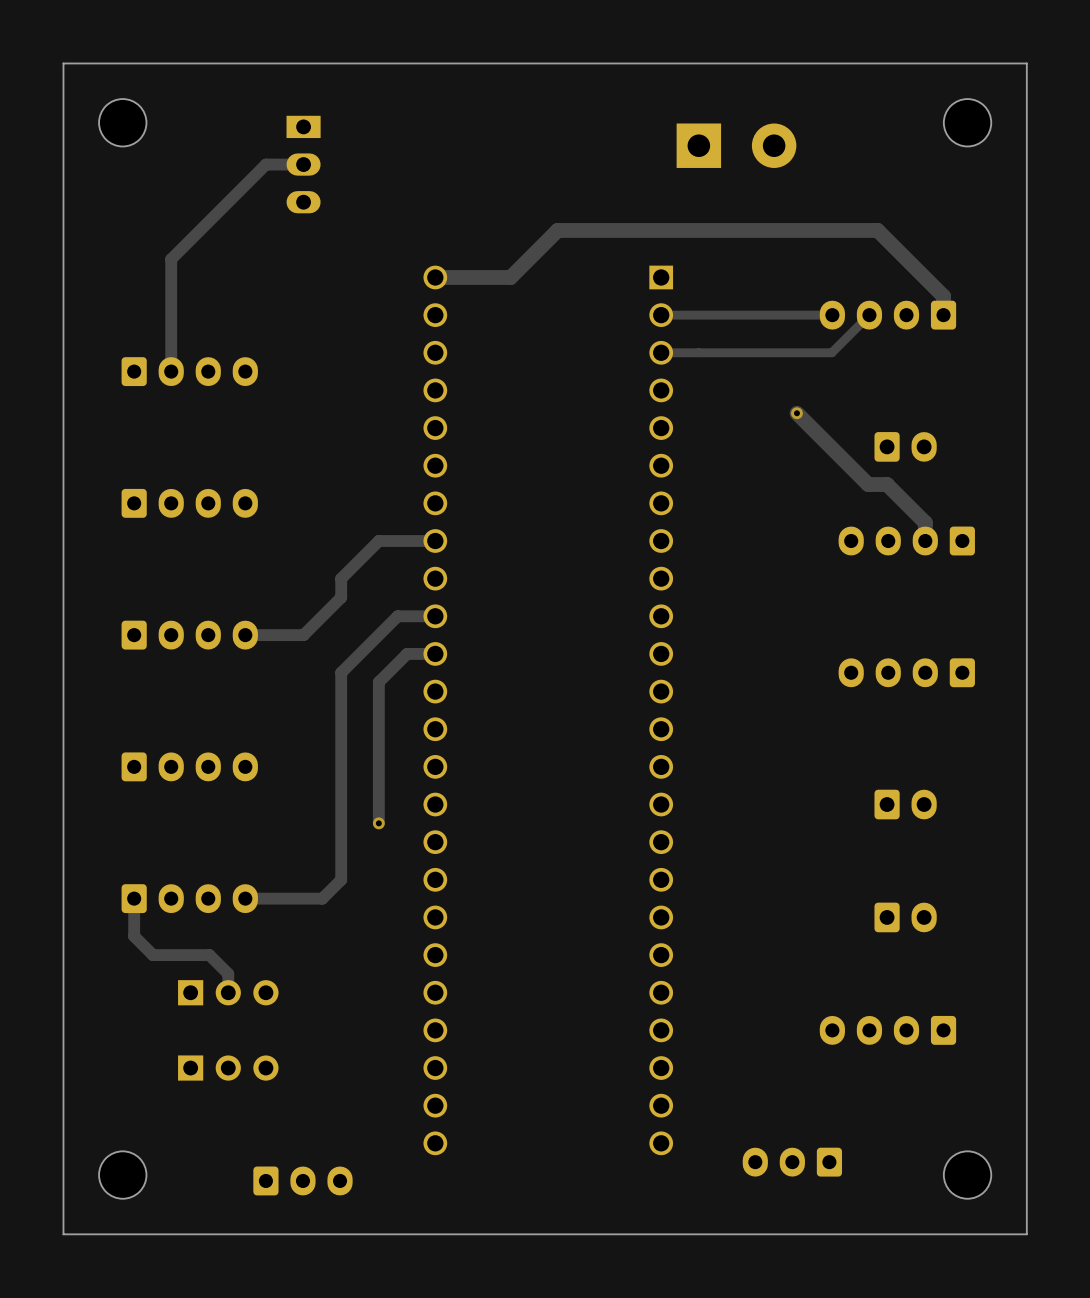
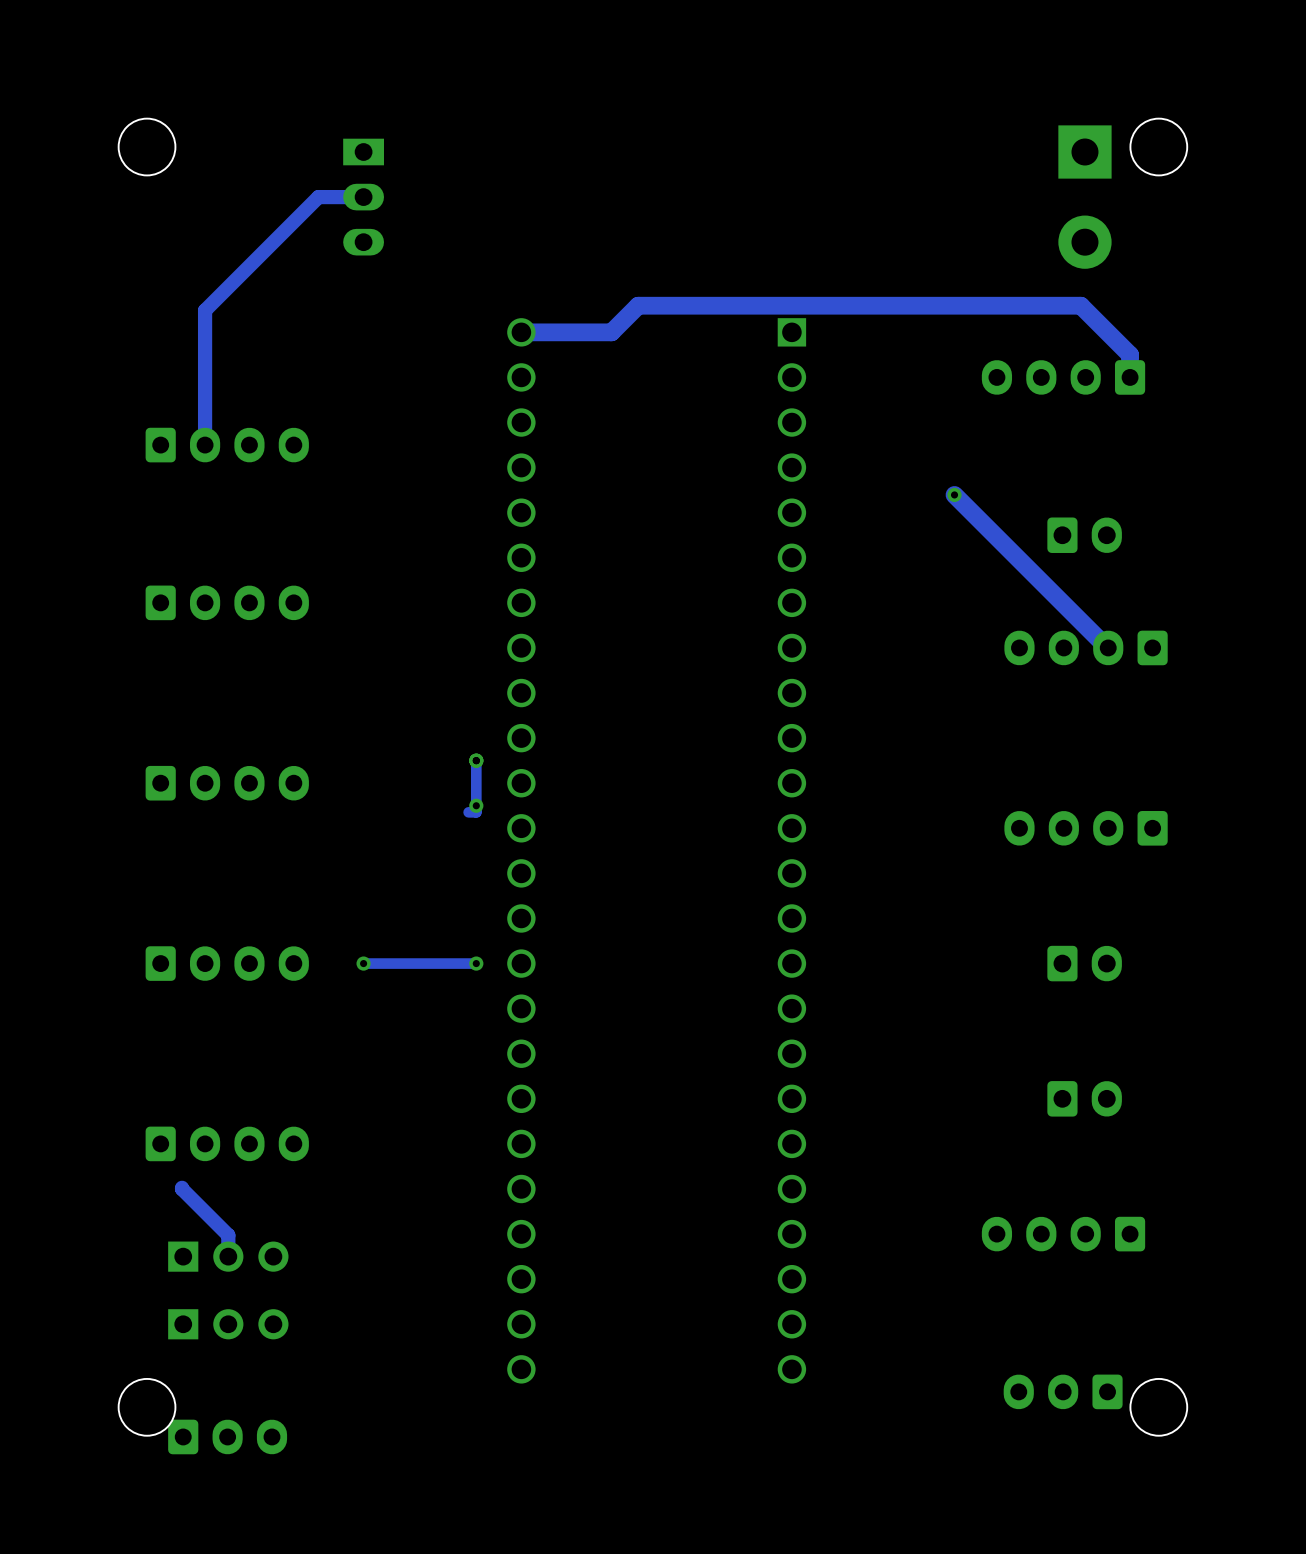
board edge: (1026, 63) (63, 63) (63, 1234) (1026, 1234) (1026, 63) -> none
part rotation: 0° (736, 145) -> 90° clockwise (1084, 197)
part position: (736, 145) -> (1084, 197)
track: (902, 255) (877, 230) (557, 230) (532, 255) -> (1080, 305) (638, 305)
track: (832, 315) (661, 315) -> none
track: (869, 315) (831, 352) (661, 352) -> none
track: (868, 484) (887, 484) (925, 522) (925, 541) -> (1039, 580) (1107, 647)
track: (435, 541) (378, 541) (341, 578) (341, 597) (303, 635) (245, 635) -> none
track: (435, 616) (397, 616) (341, 672) (341, 879) (322, 898) (245, 898) -> none
part position: (189, 635) -> (227, 783)
track: none -> (476, 760) (476, 812) (468, 812)
via: none -> (476, 760)
track: (435, 653) (407, 653) (378, 682) (378, 823) -> none
via: none -> (476, 805)
part position: (906, 672) -> (1086, 828)
part position: (189, 766) -> (227, 963)
via: none -> (363, 963)
track: none -> (476, 963) (363, 963)
via position: (378, 823) -> (476, 963)
track: (134, 898) (134, 936) (152, 955) (209, 955) (228, 973) (228, 992) -> none
part: (189, 898) -> none
part: none -> (227, 1143)
track: none -> (182, 1187) (228, 1235) (228, 1256)
part: (228, 992) -> none
part: none -> (228, 1256)
part: (228, 1068) -> none
part: none -> (228, 1324)
part position: (792, 1162) -> (1063, 1391)
part position: (302, 1180) -> (227, 1436)

